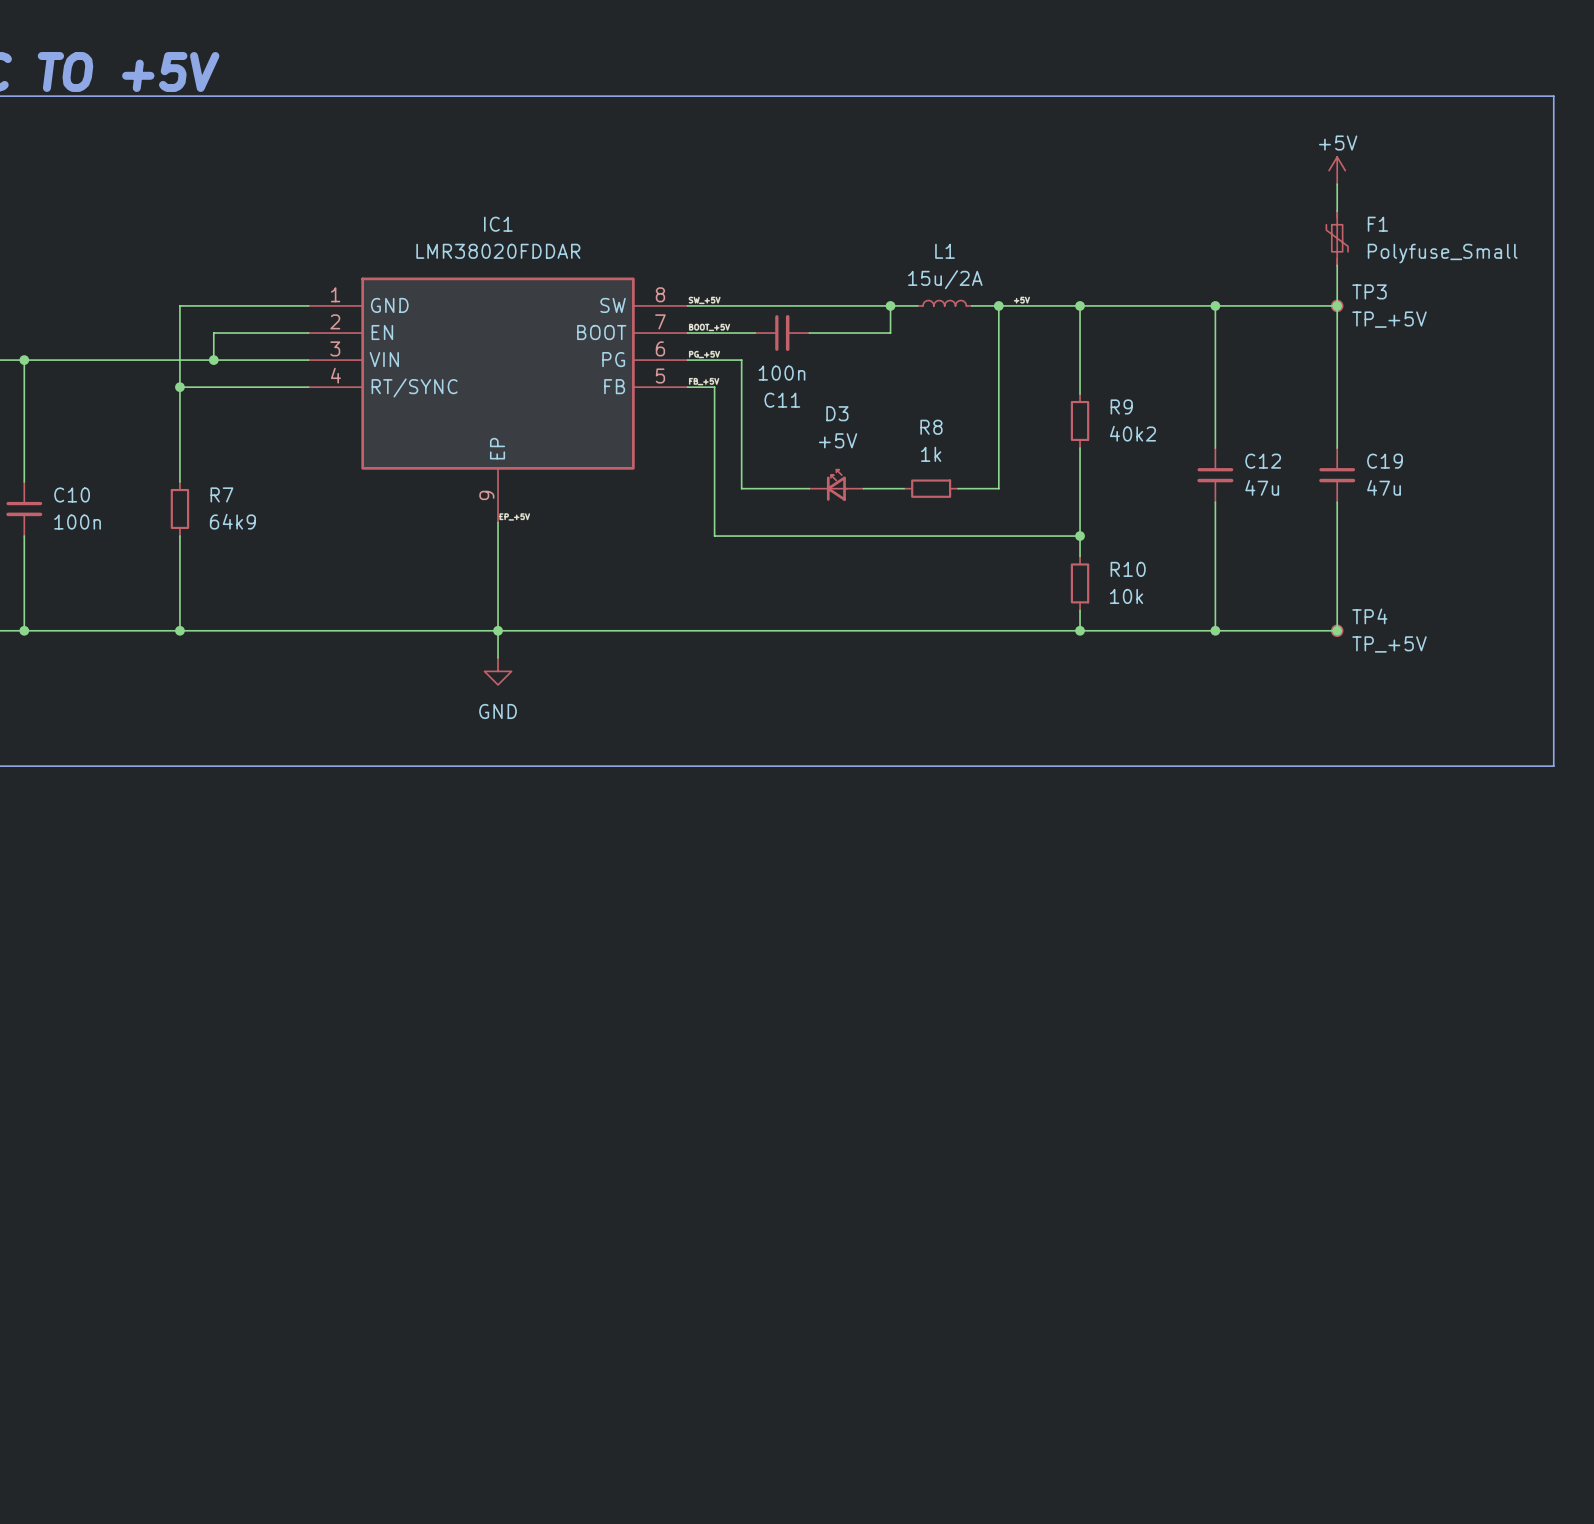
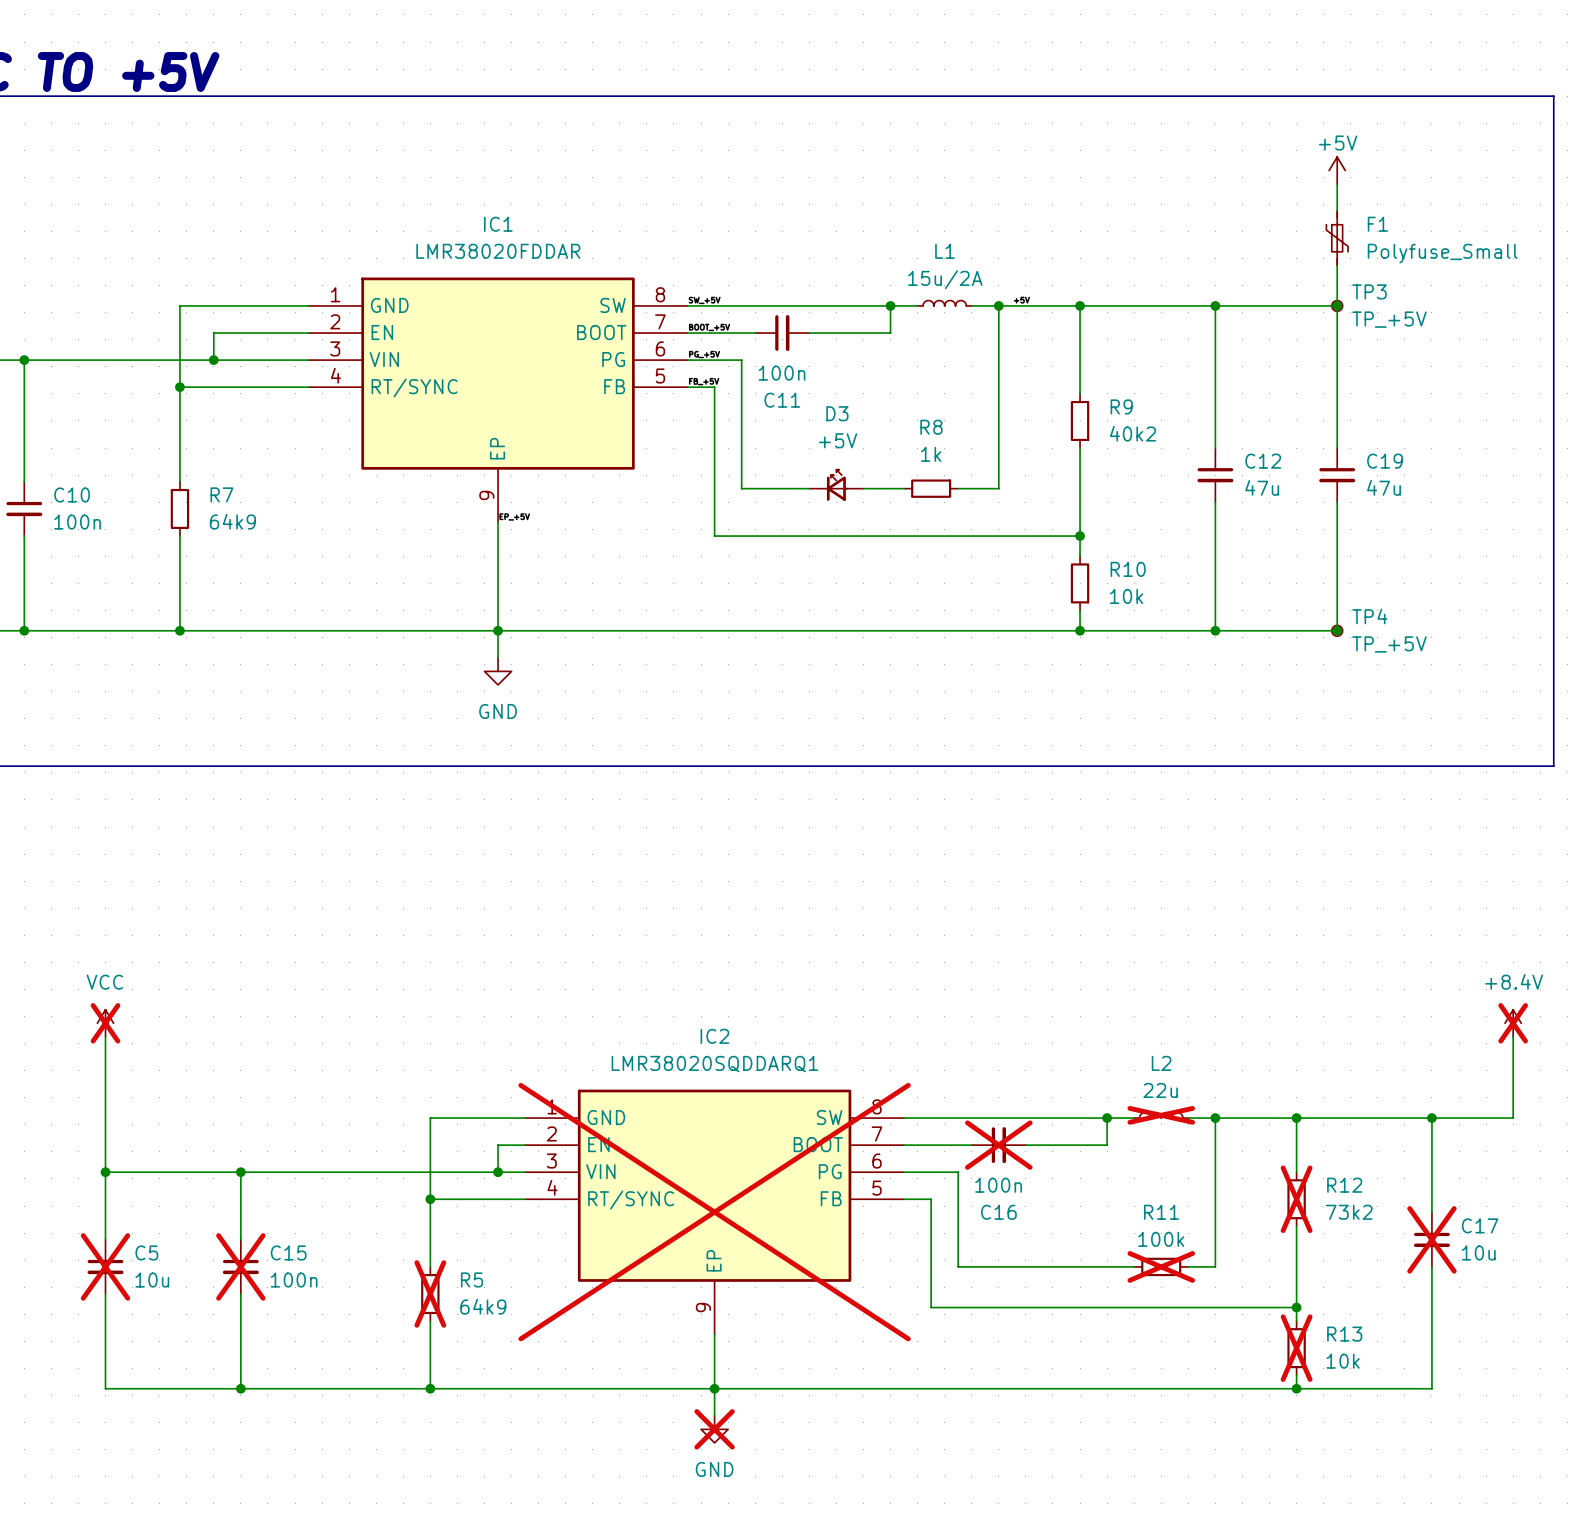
power symbol: none -> VCC (105, 1023)
power symbol: none -> +8.4V (1513, 1023)
wire: none -> (105, 1036) (105, 1239)
wire: none -> (1513, 1036) (1513, 1118) (1188, 1118)
L2: none -> 22u (1161, 1115)
wire: none -> (525, 1118) (430, 1118) (430, 1266)
wire: none -> (904, 1118) (1134, 1118)
wire: none -> (1107, 1118) (1107, 1145) (1025, 1145)
junction: none -> (1107, 1118)
wire: none -> (1215, 1118) (1215, 1266) (1188, 1266)
junction: none -> (1215, 1118)
wire: none -> (1296, 1118) (1296, 1172)
junction: none -> (1296, 1118)
wire: none -> (1431, 1118) (1431, 1212)
junction: none -> (1431, 1118)
wire: none -> (525, 1145) (498, 1145) (498, 1172)
wire: none -> (904, 1145) (971, 1145)
C16: none -> 100n (998, 1145)
wire: none -> (105, 1172) (525, 1172)
junction: none -> (105, 1172)
wire: none -> (240, 1172) (240, 1239)
junction: none -> (240, 1172)
junction: none -> (498, 1172)
wire: none -> (904, 1172) (958, 1172) (958, 1266) (1134, 1266)
wire: none -> (430, 1199) (525, 1199)
junction: none -> (430, 1199)
wire: none -> (904, 1199) (931, 1199) (931, 1307) (1296, 1307)
R12: none -> 73k2 (1296, 1199)
IC2: none -> LMR38020SQDDARQ1 (714, 1212)
wire: none -> (1296, 1226) (1296, 1321)
C17: none -> 10u (1431, 1239)
C5: none -> 10u (105, 1266)
C15: none -> 100n (240, 1266)
R11: none -> 100k (1161, 1266)
wire: none -> (1431, 1266) (1431, 1388) (105, 1388) (105, 1294)
wire: none -> (240, 1294) (240, 1388)
R5: none -> 64k9 (430, 1294)
junction: none -> (1296, 1307)
wire: none -> (430, 1321) (430, 1388)
wire: none -> (714, 1334) (714, 1415)
R13: none -> 10k (1296, 1348)
wire: none -> (1296, 1375) (1296, 1388)
junction: none -> (240, 1388)
junction: none -> (430, 1388)
junction: none -> (714, 1388)
junction: none -> (1296, 1388)
power symbol: none -> GND (714, 1429)

